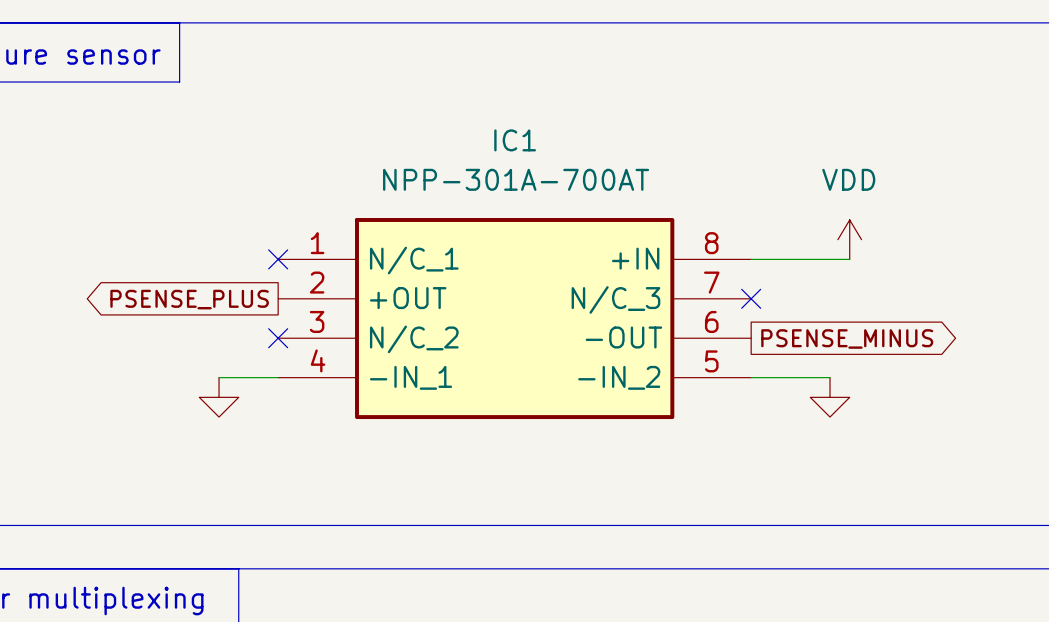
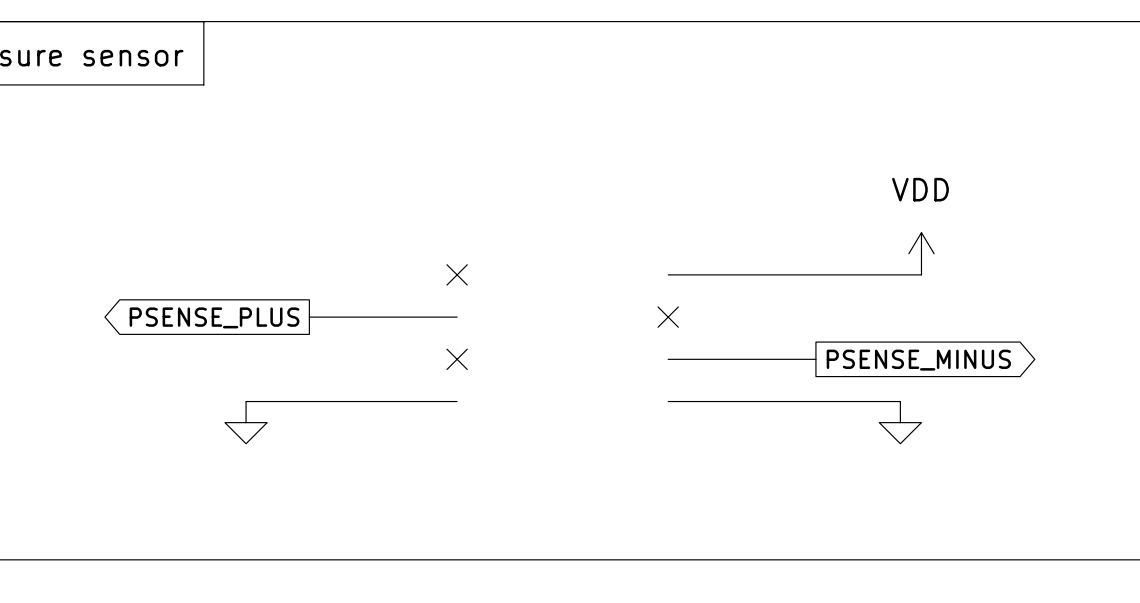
no-connect mark: (278, 259) -> none
no-connect mark: none -> (457, 274)
no-connect mark: none -> (668, 317)
no-connect mark: (751, 298) -> none
IC1: NPP-301A-700AT (514, 318) -> none
no-connect mark: (278, 338) -> none
no-connect mark: none -> (457, 359)

